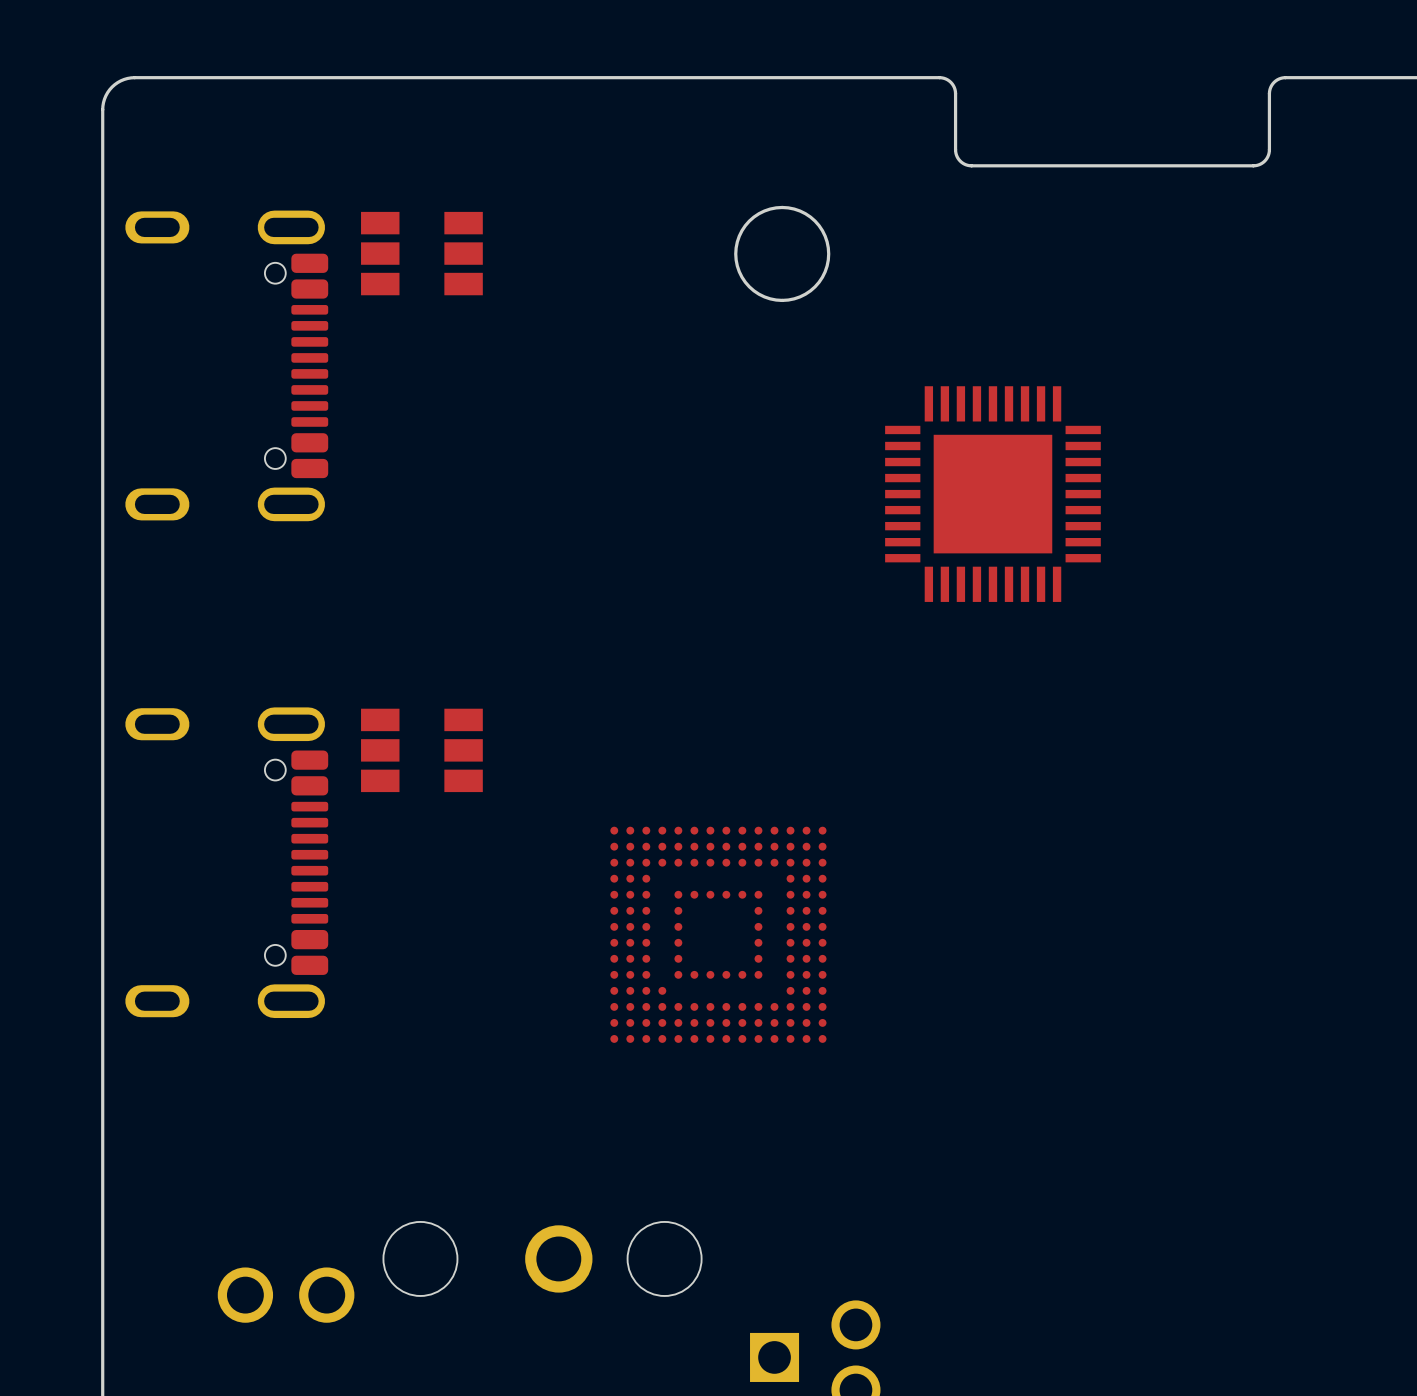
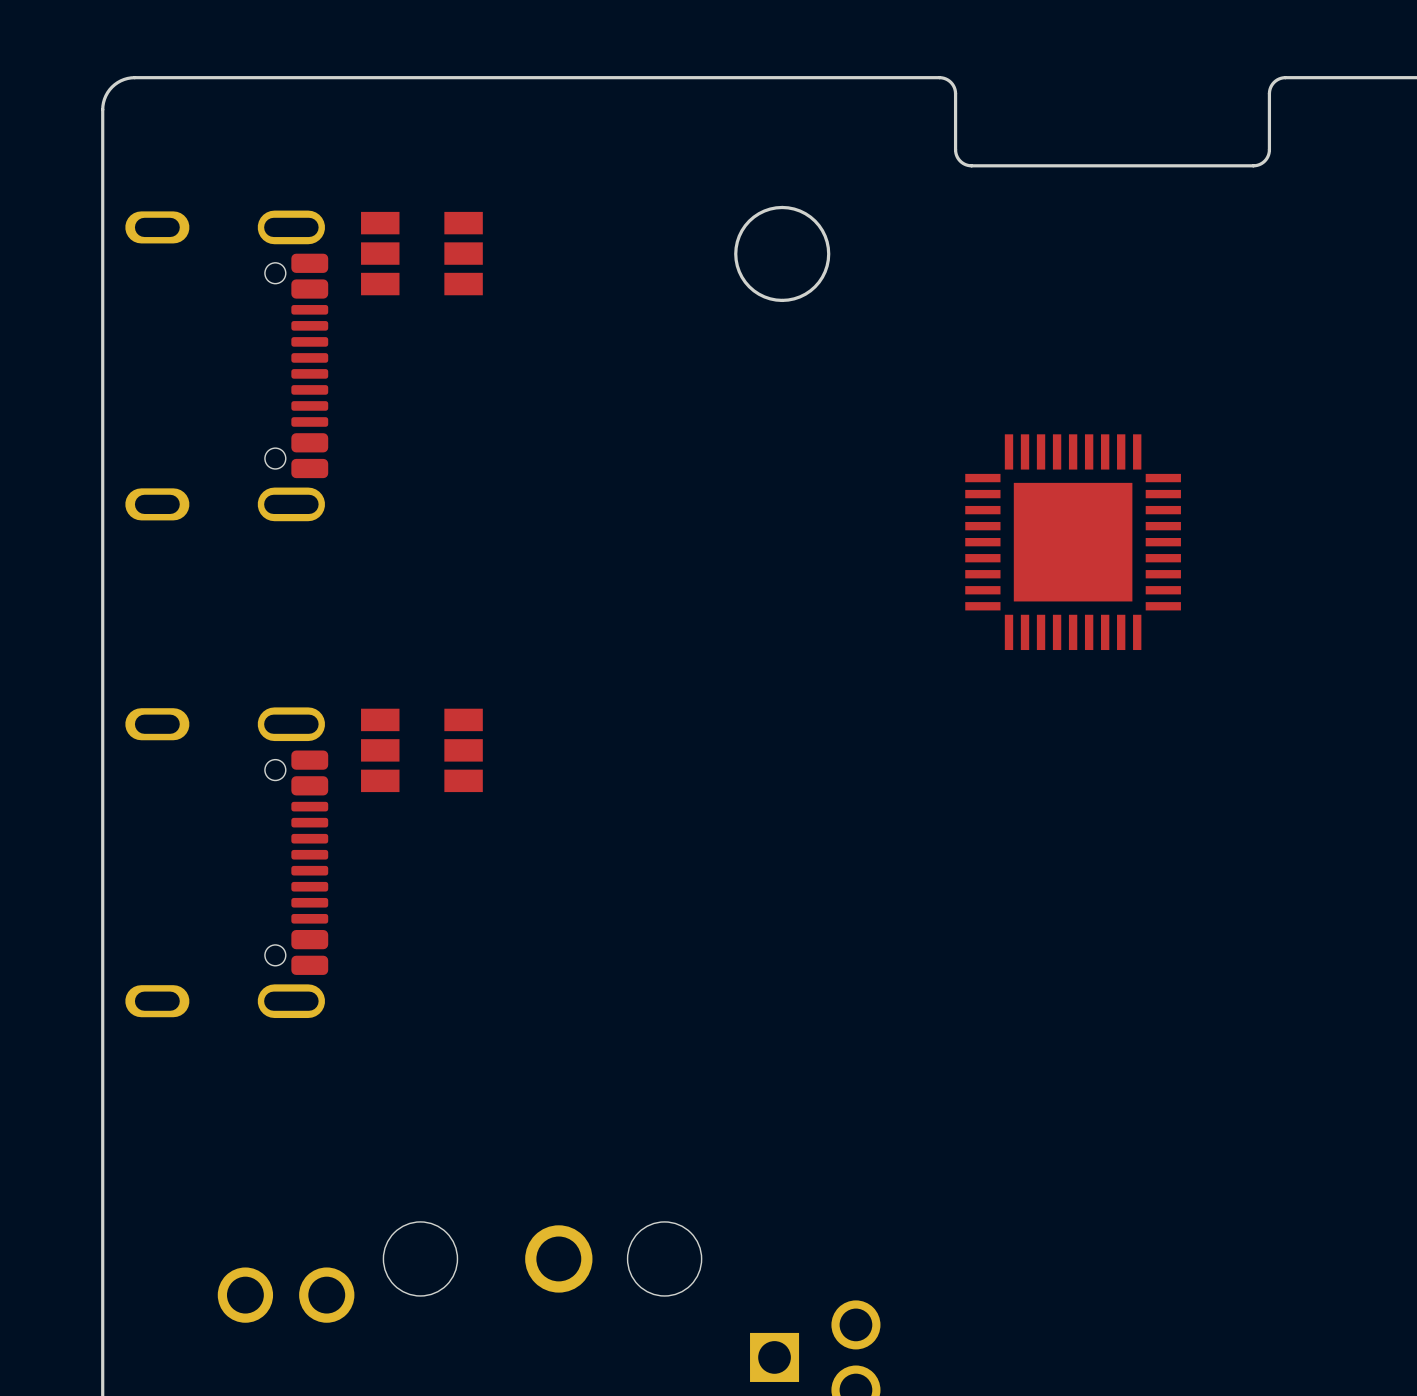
part position: (992, 494) -> (1073, 542)
part: (718, 934) -> none

